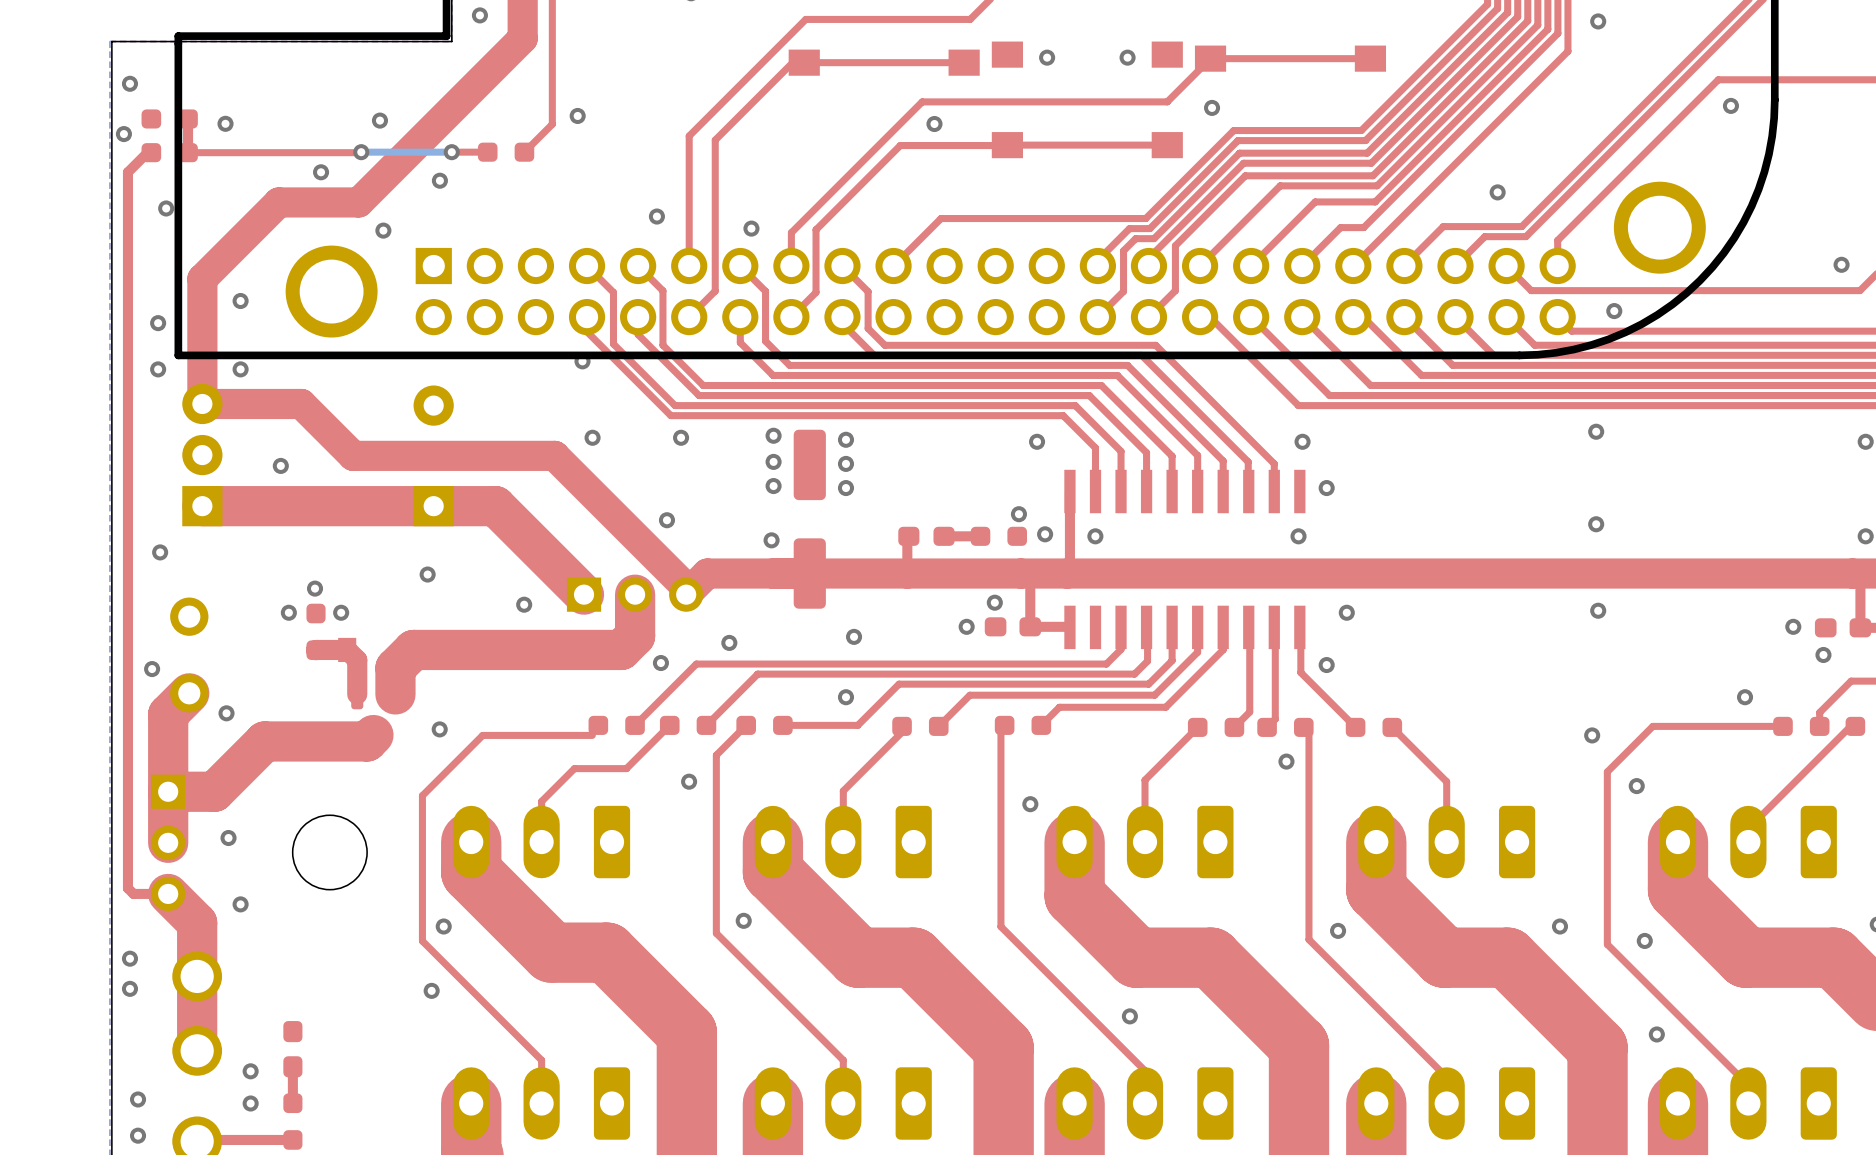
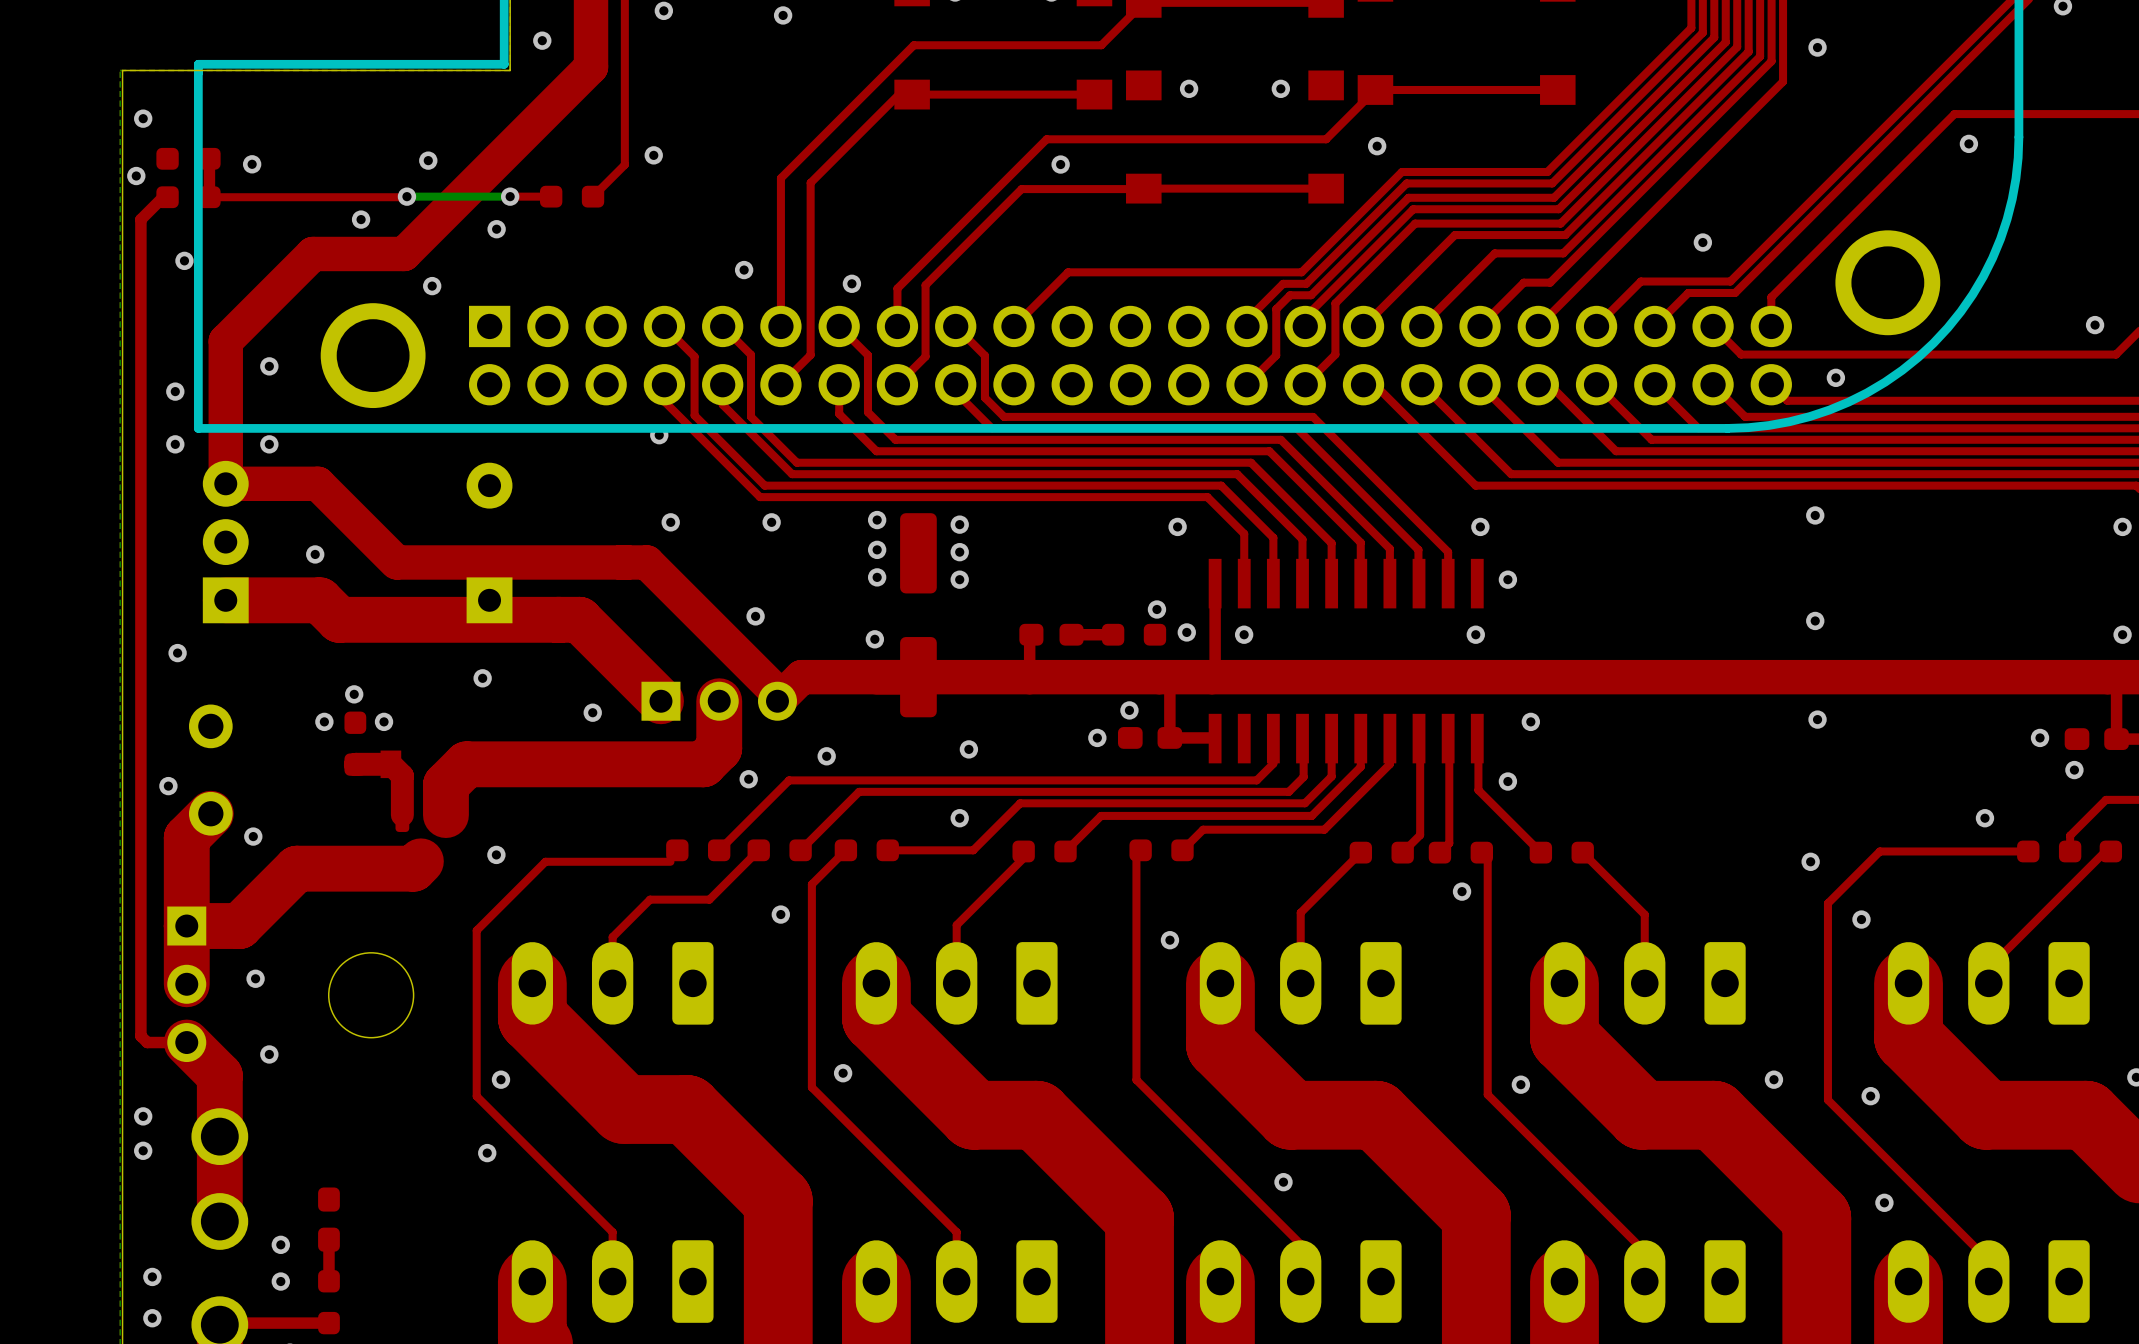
top track: (283, 403) (301, 403) (353, 455) (554, 455) (571, 472) -> (397, 562) (646, 562)
top track: none -> (317, 483) (396, 562)
top track: (284, 506) (495, 506) (512, 523) -> (319, 600) (339, 619) (579, 619)

